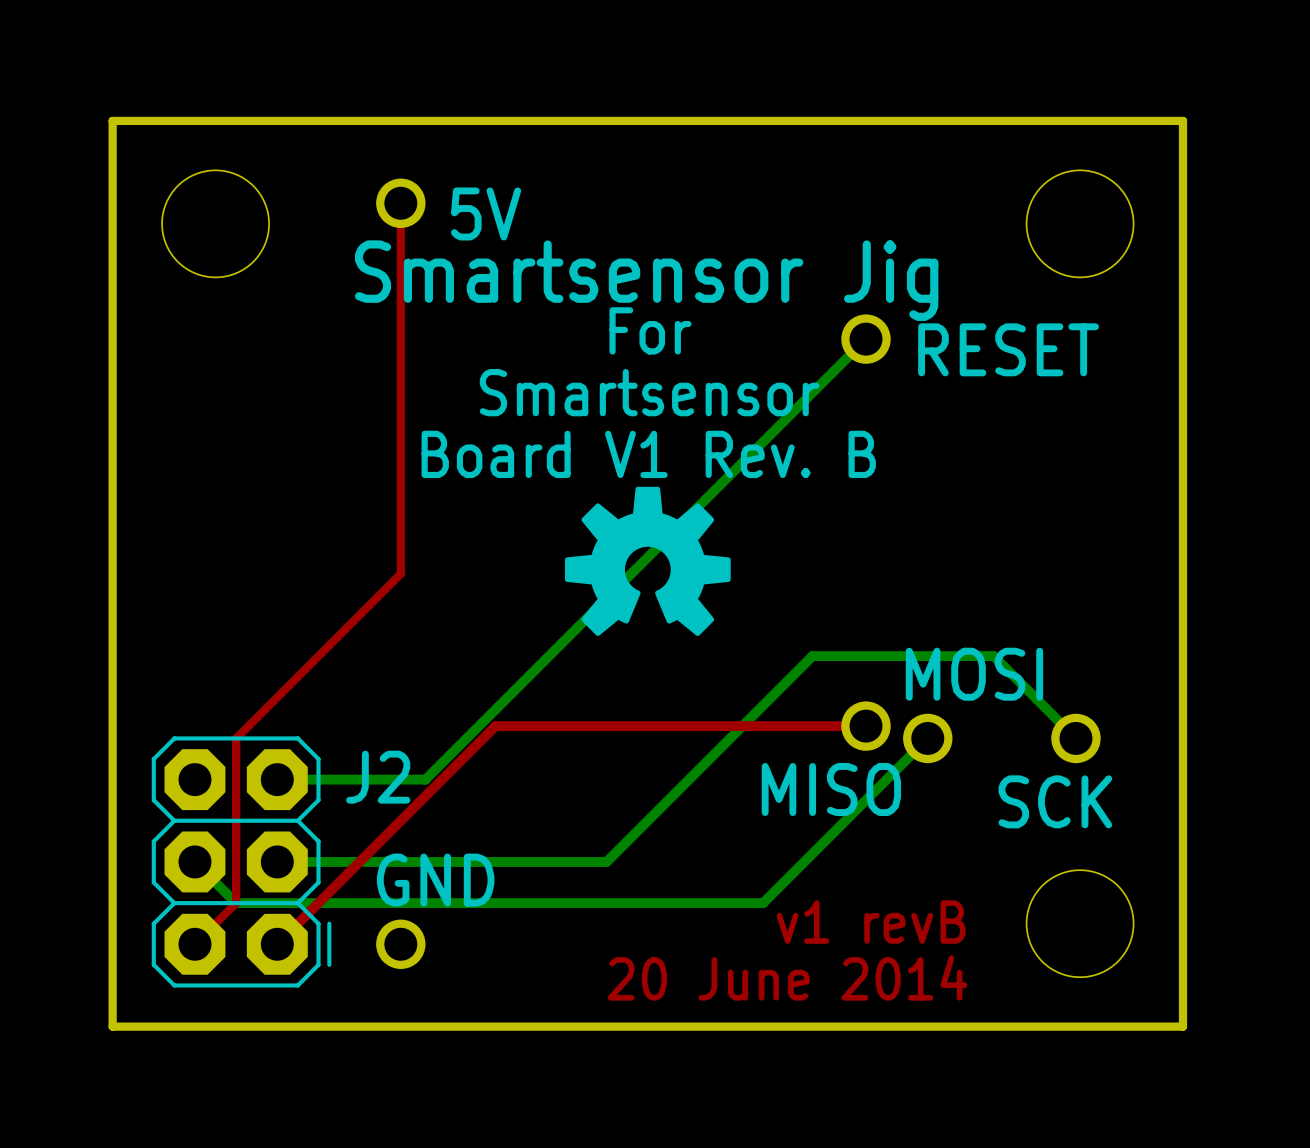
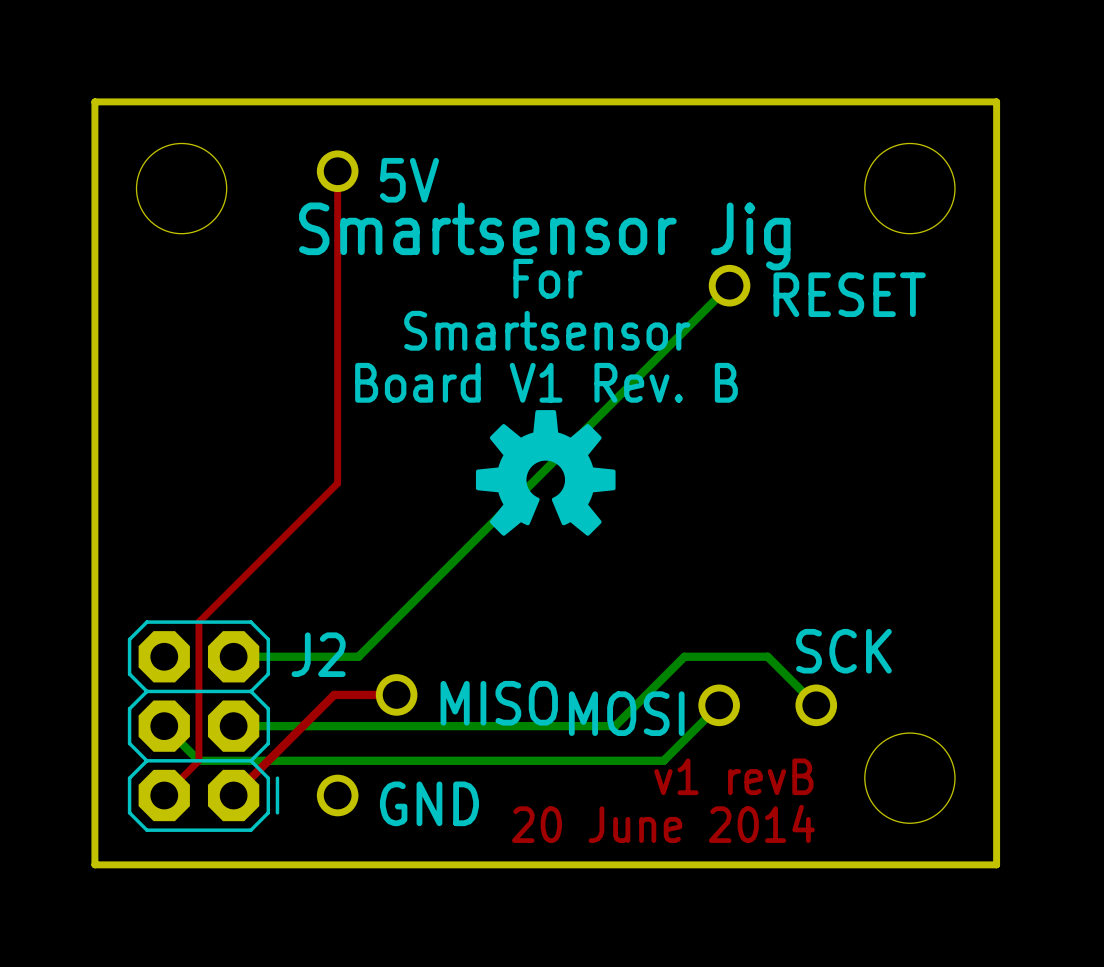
MOSI name position: MOSI (974, 674) -> MOSI (626, 713)
top track: (866, 726) (495, 726) (396, 824) -> (396, 694) (334, 694)
MISO position: (866, 726) -> (396, 694)
bottom track: (927, 738) (763, 903) -> (719, 705) (663, 760) (642, 760)
MOSI position: (927, 738) -> (719, 705)
bottom track: (1075, 738) (993, 656) (812, 656) (606, 861) -> (816, 705) (767, 656) (684, 656) (615, 726) (511, 726)
SCK position: (1075, 738) -> (816, 705)
MISO name position: MISO (831, 789) -> MISO (499, 703)
SCK name position: SCK (1055, 801) -> SCK (843, 651)
GND name position: GND (435, 880) -> GND (429, 803)

